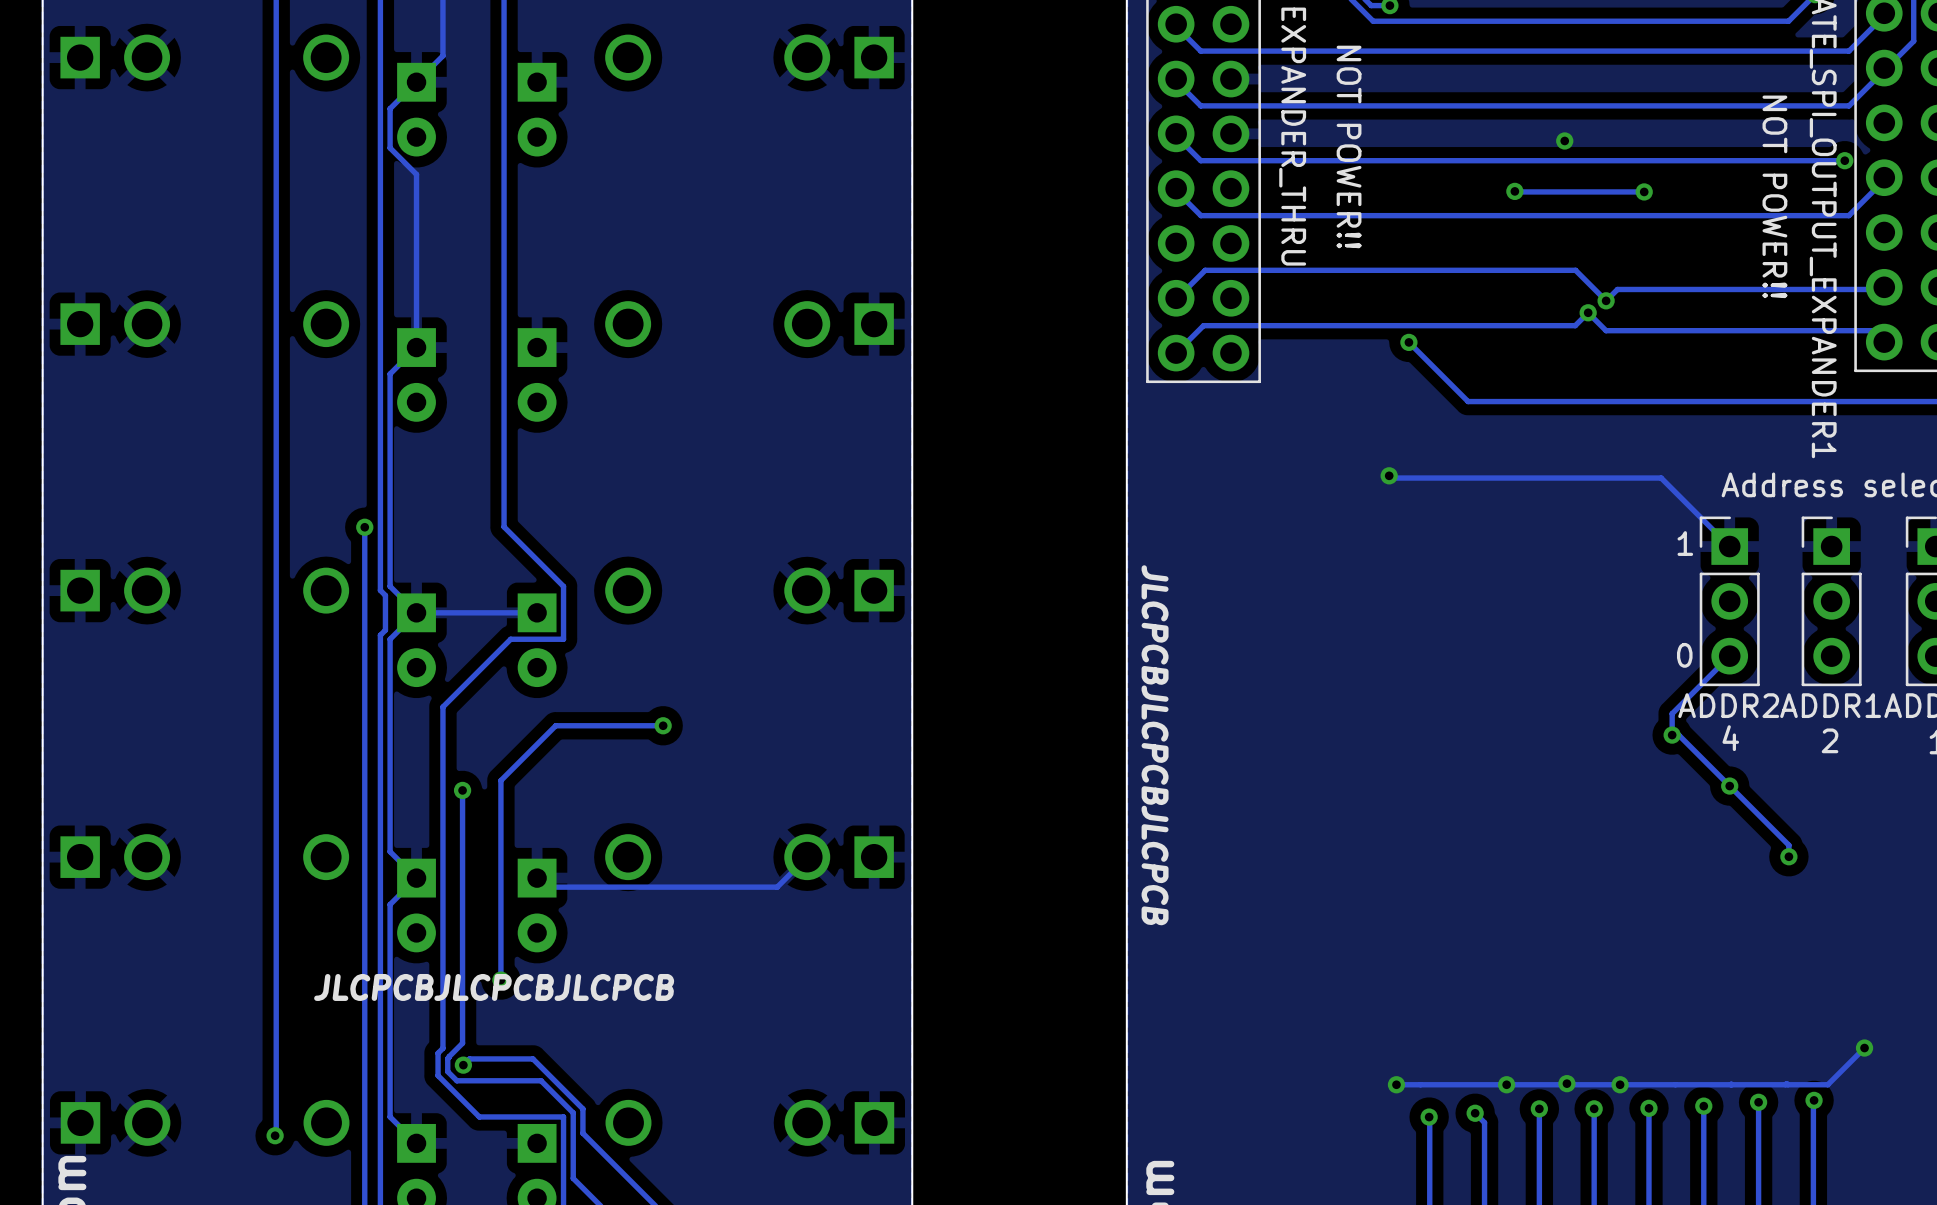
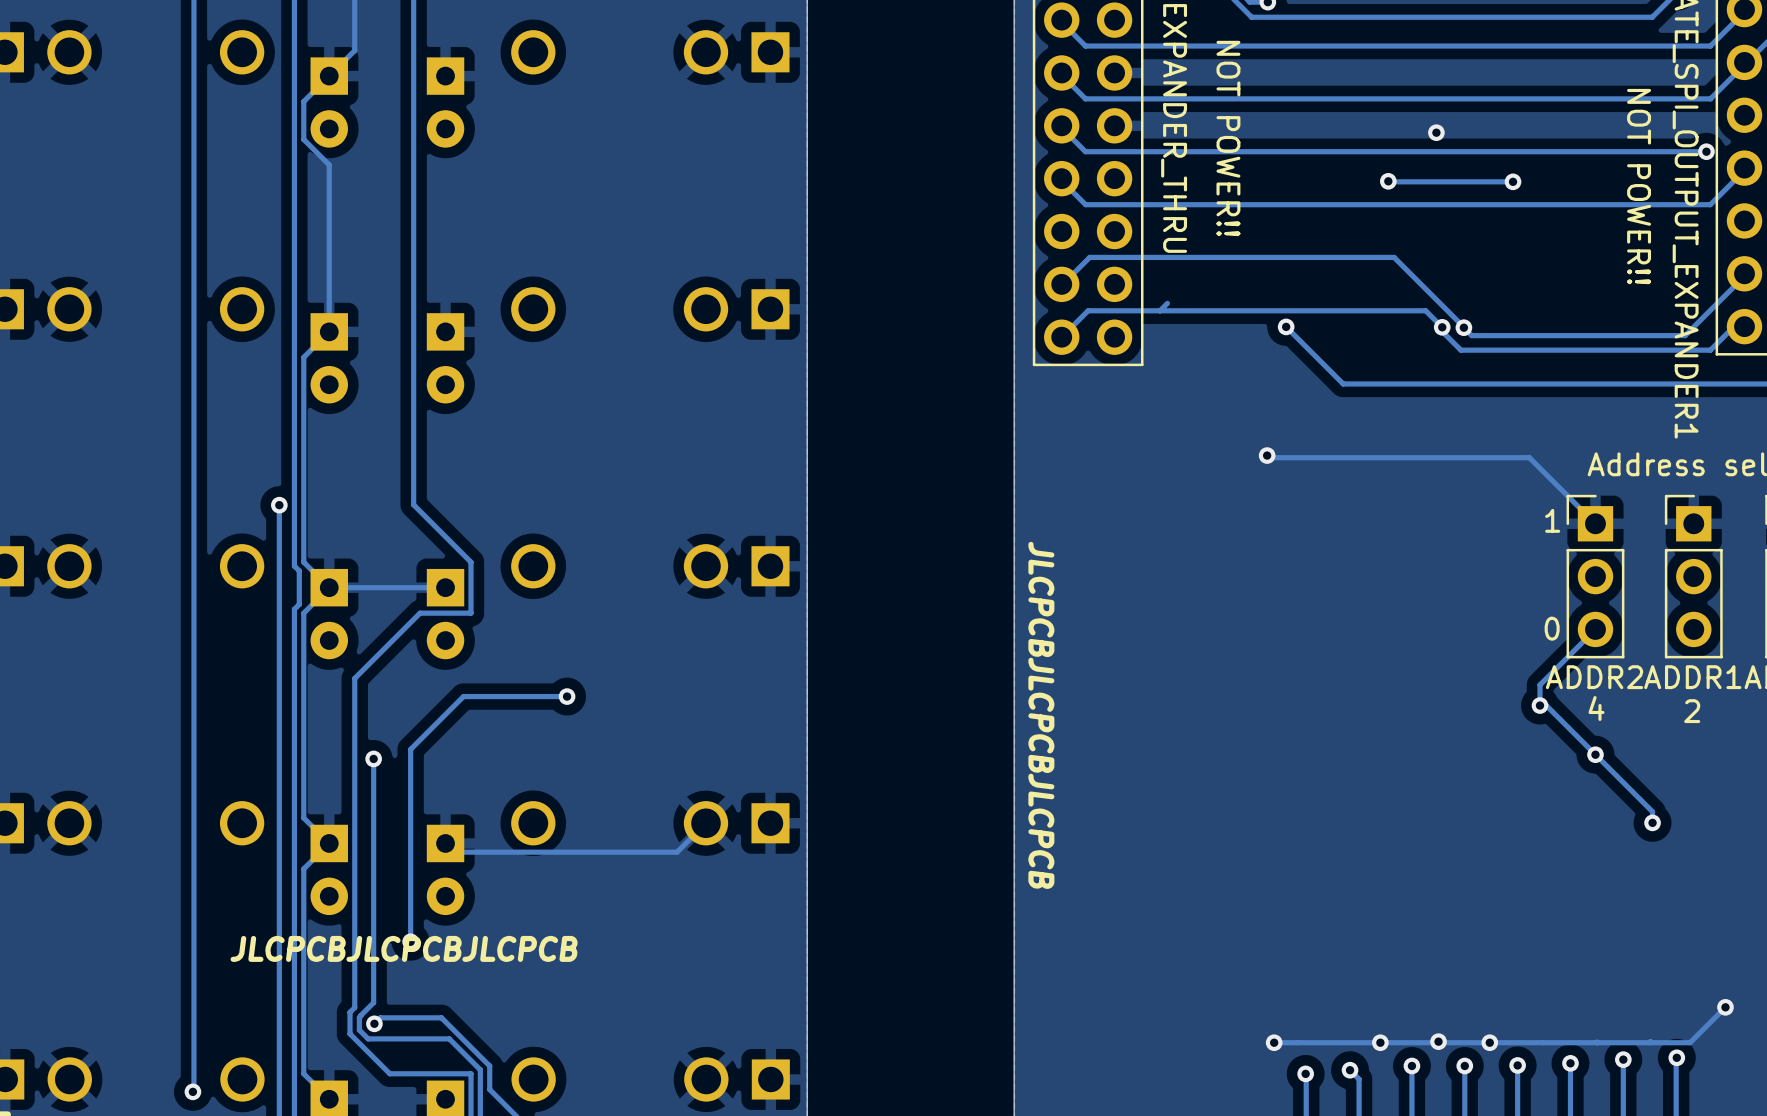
track: (1520, 270) (1575, 270) (1606, 300) (1617, 289) (1884, 289) -> (1394, 257) (1471, 335) (1685, 335) (1744, 275)
via: (1606, 300) -> none
via: (1588, 312) -> none
track: none -> (1167, 303) (1160, 310)
track: (1553, 325) (1575, 325) (1588, 312) (1606, 330) (1884, 330) -> (1425, 310) (1460, 350) (1710, 350) (1745, 315)
via: none -> (1442, 327)
via: none -> (1463, 327)

